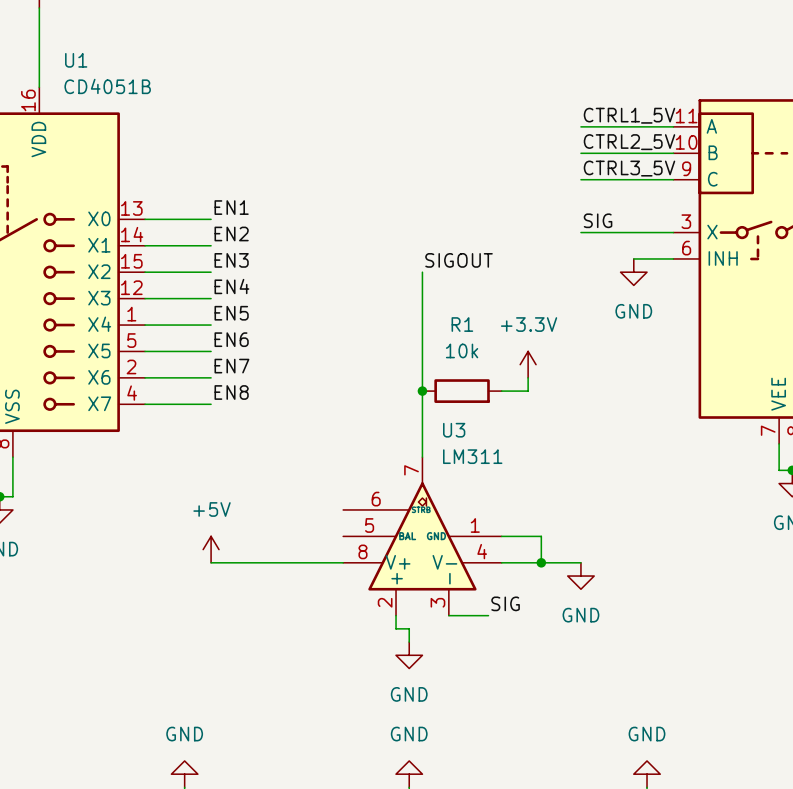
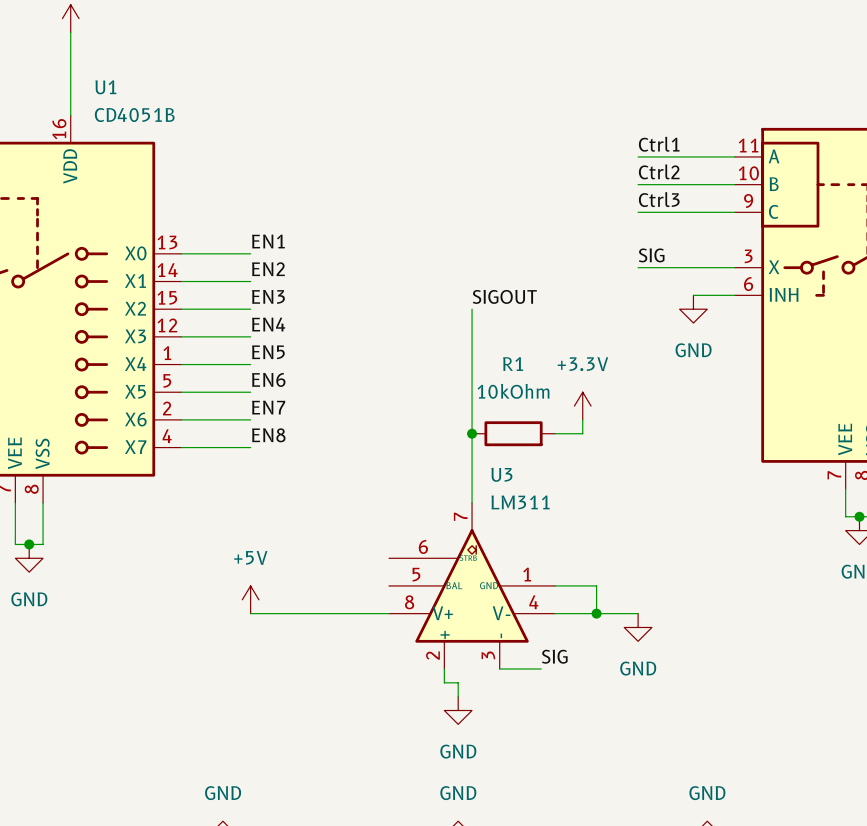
label: CTRL1_5V (629, 115) -> Ctrl1 (659, 144)
label: CTRL2_5V (629, 142) -> Ctrl2 (659, 171)
label: CTRL3_5V (629, 168) -> Ctrl3 (659, 199)
R1 value: 10k (462, 350) -> 10kOhm (513, 391)

